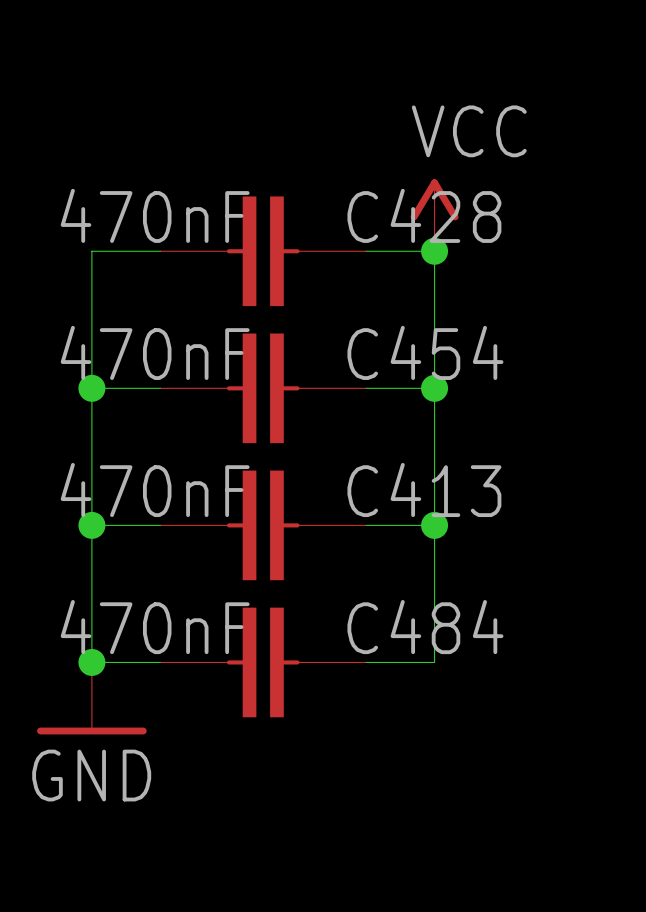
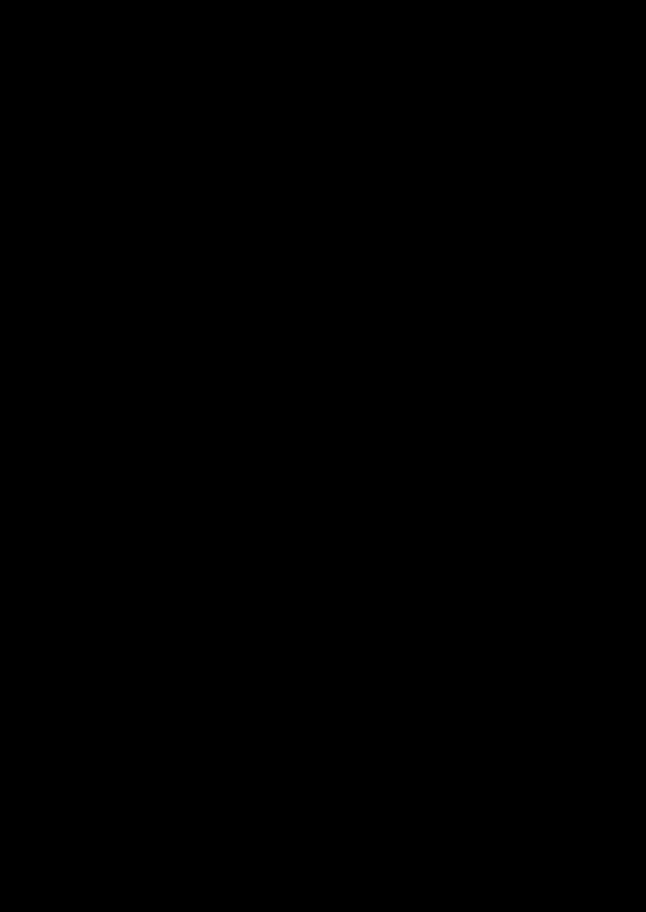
power symbol: VCC (434, 215) -> none
wire: (160, 251) (91, 251) (91, 662) (160, 662) -> none
C428: 470nF (263, 251) -> none
wire: (366, 251) (434, 251) (434, 662) (366, 662) -> none
junction: (434, 251) -> none
wire: (91, 388) (160, 388) -> none
junction: (91, 388) -> none
C454: 470nF (263, 388) -> none
wire: (366, 388) (434, 388) -> none
junction: (434, 388) -> none
wire: (91, 525) (160, 525) -> none
junction: (91, 525) -> none
C413: 470nF (263, 525) -> none
wire: (366, 525) (434, 525) -> none
junction: (434, 525) -> none
junction: (91, 662) -> none
C484: 470nF (263, 662) -> none
power symbol: GND (91, 698) -> none

